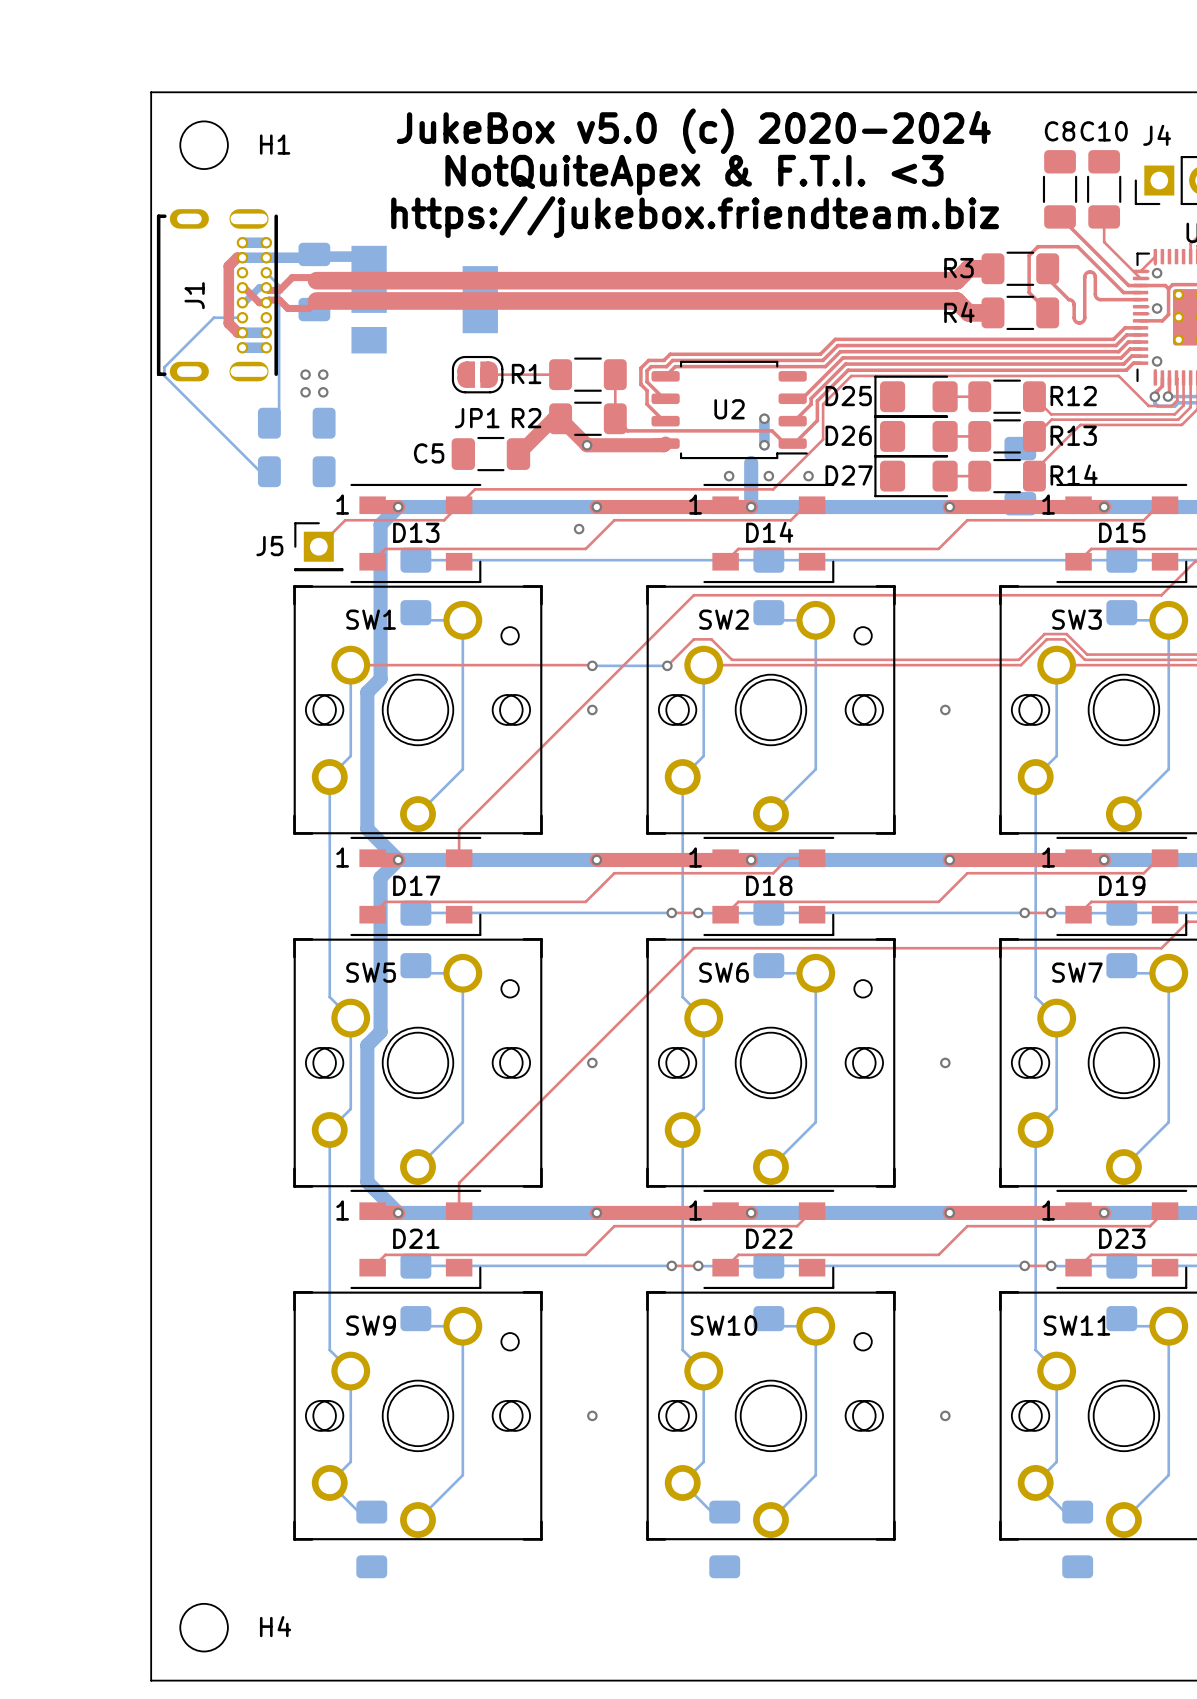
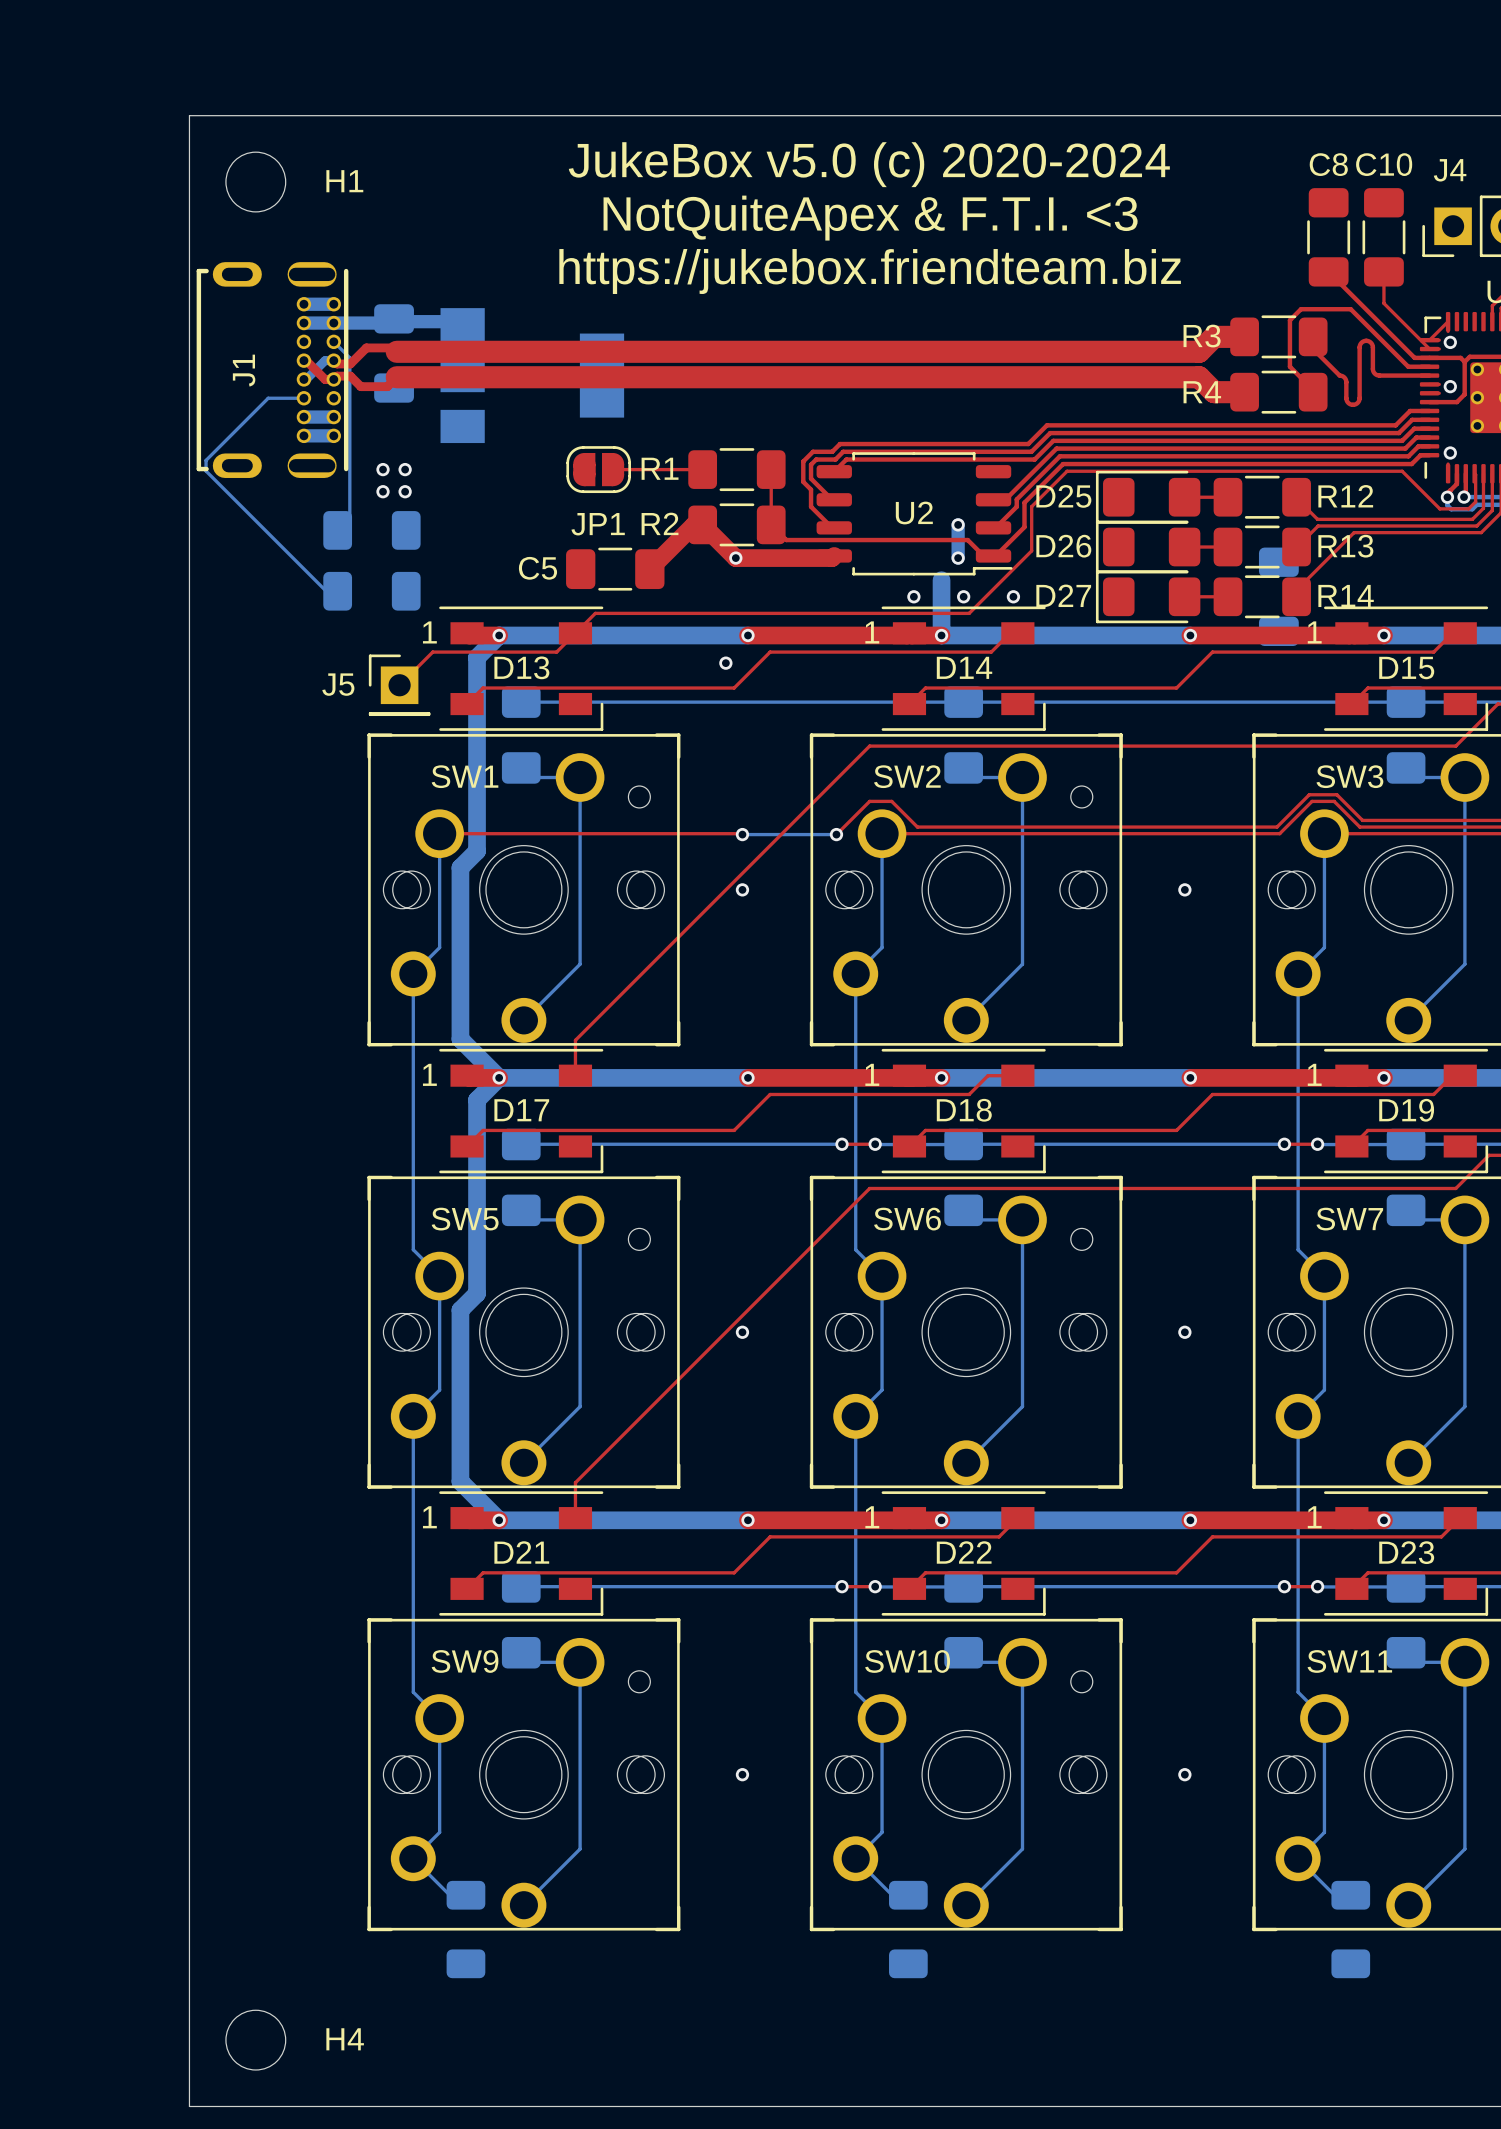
top track: (242, 257) (237, 257) (228, 266) (228, 323) (238, 332) (242, 332) -> none

